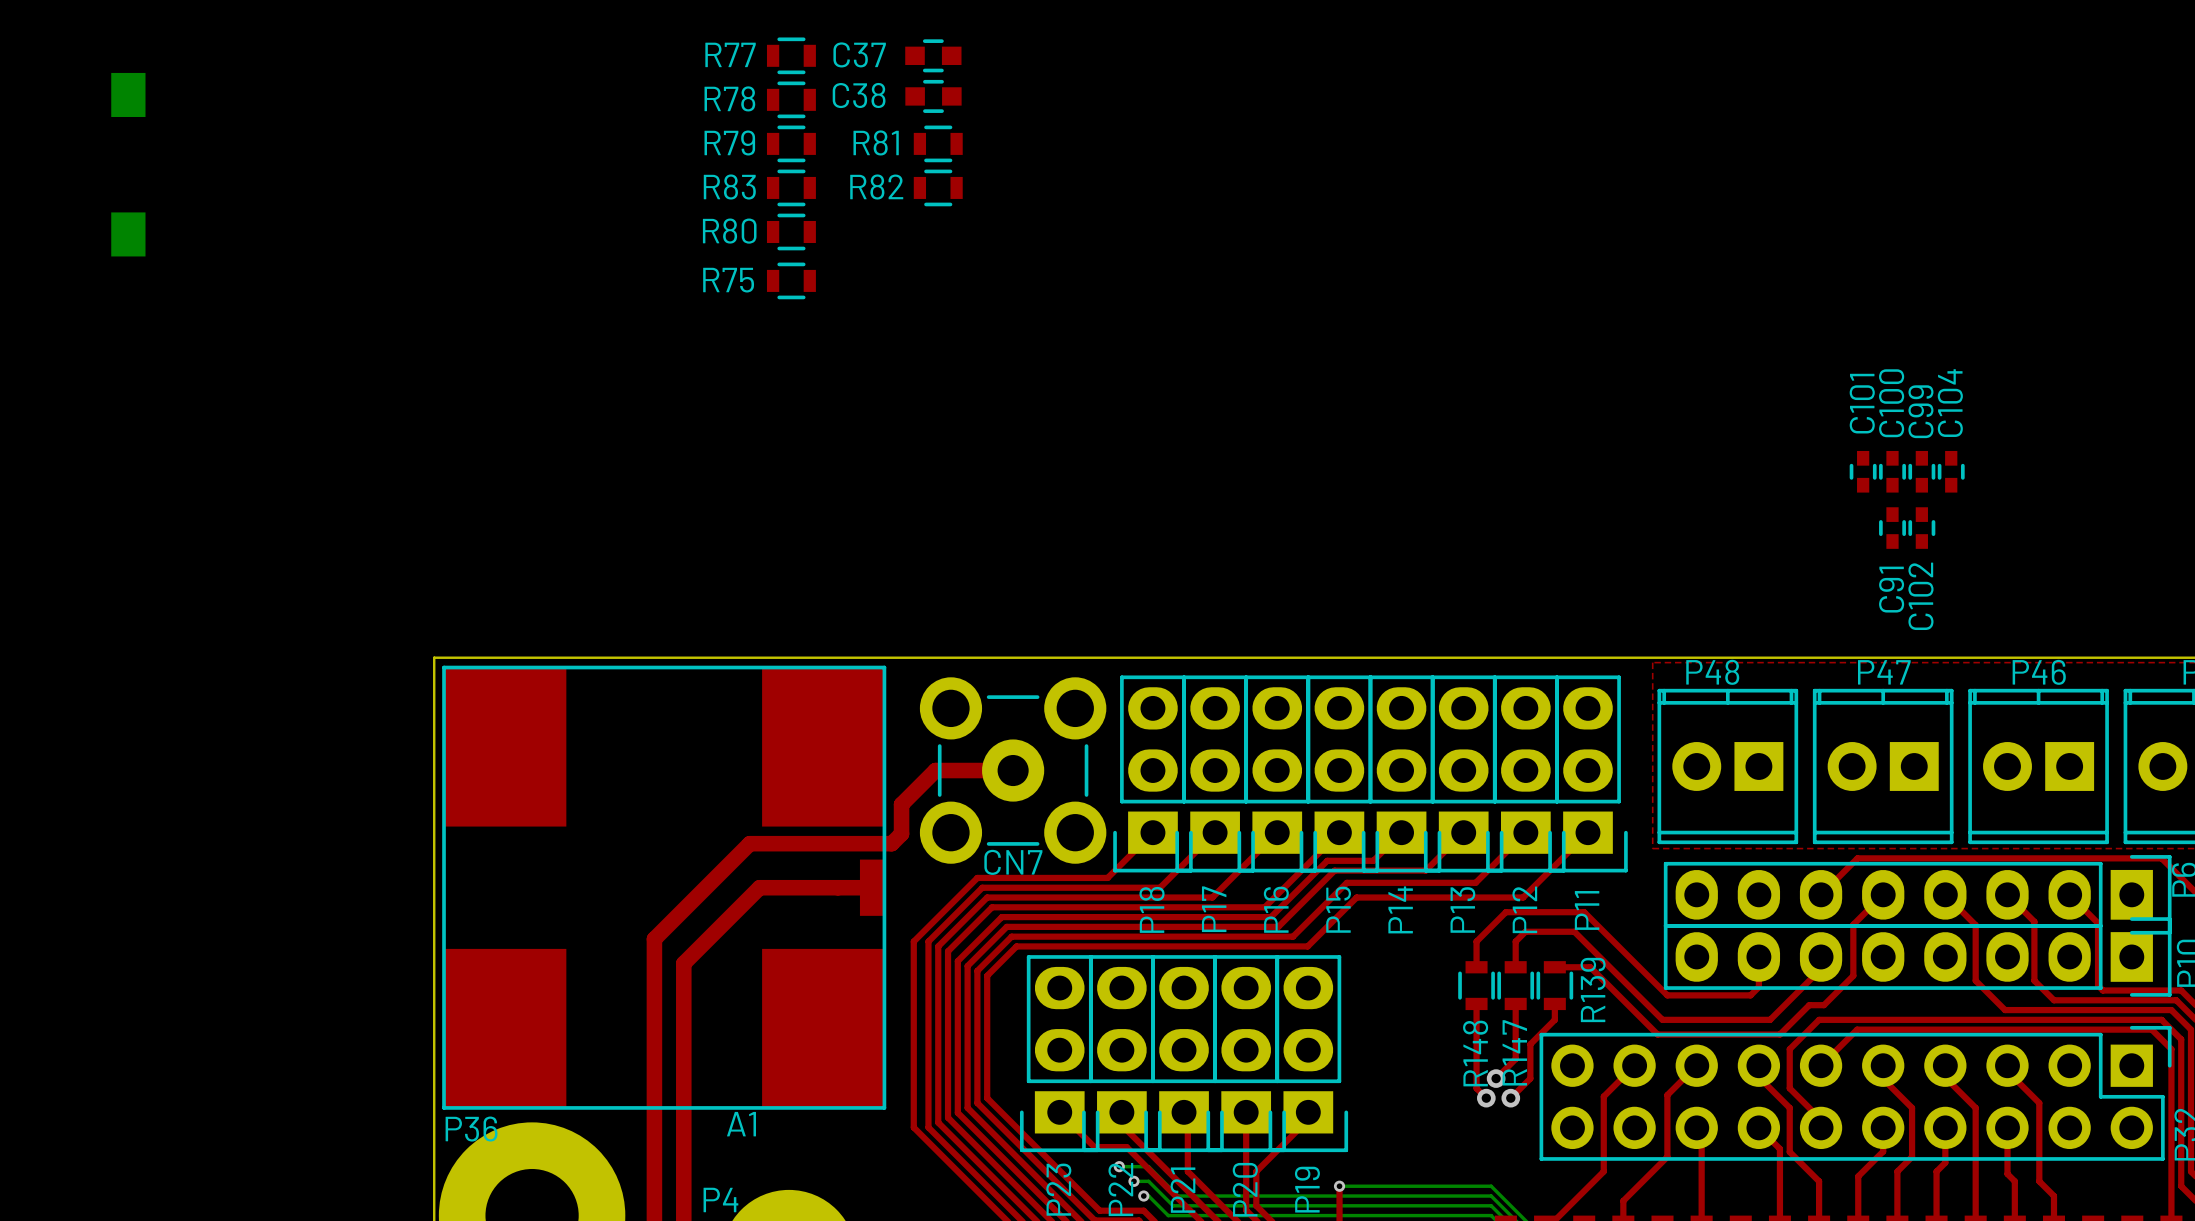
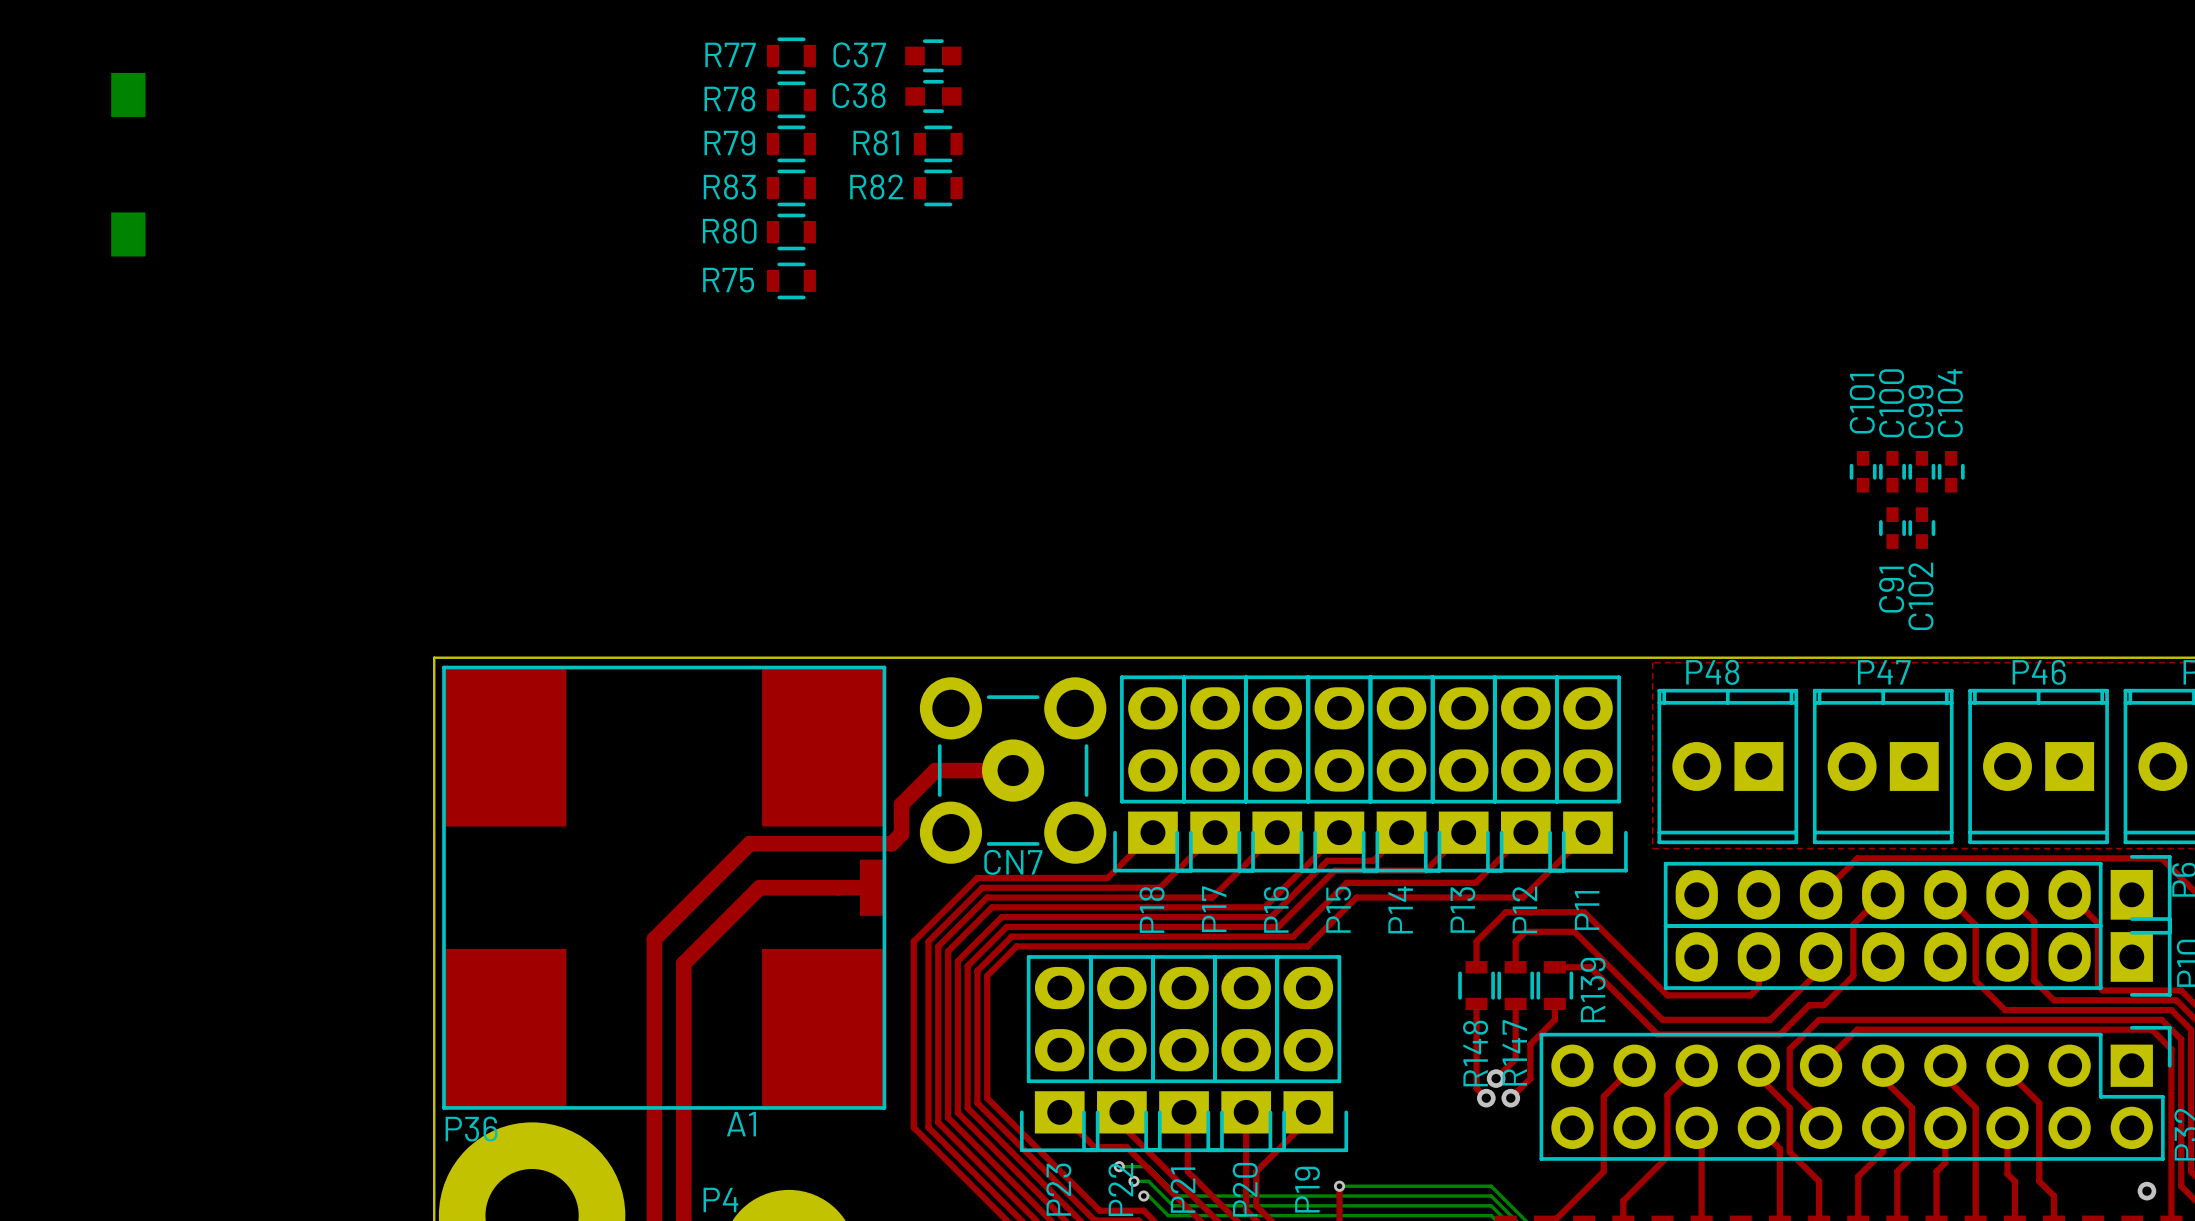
via: none -> (2146, 1191)

